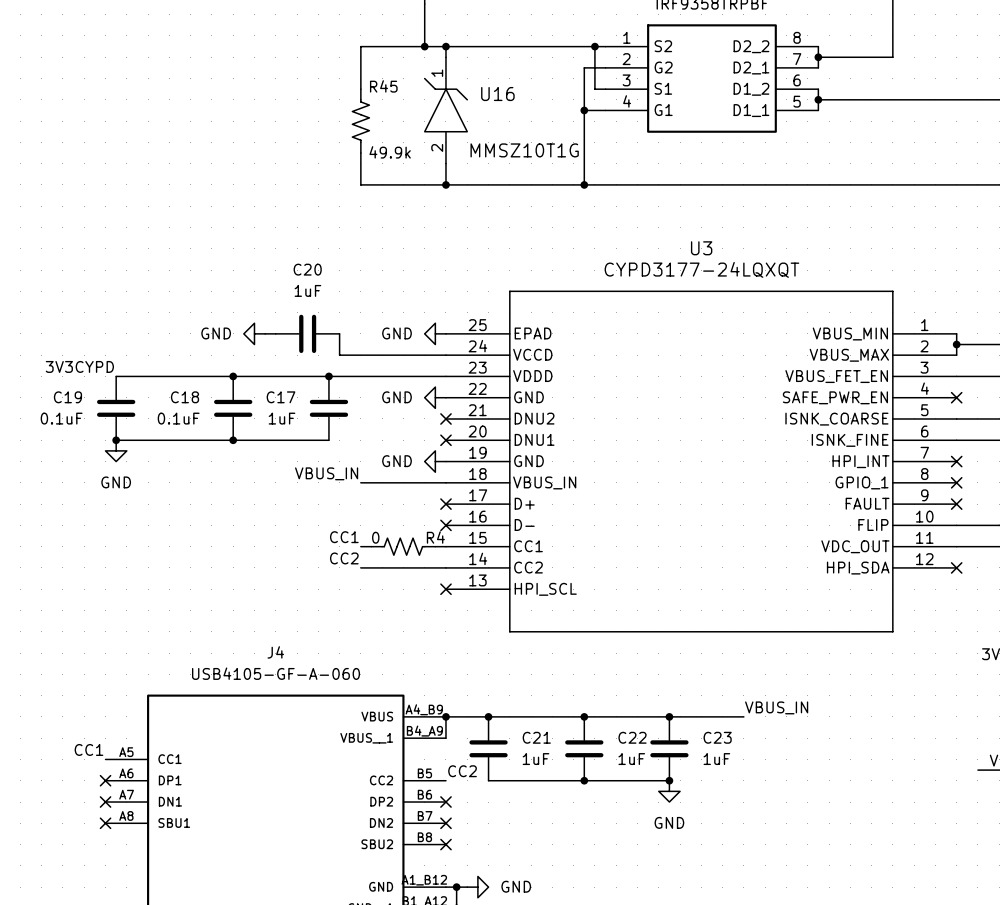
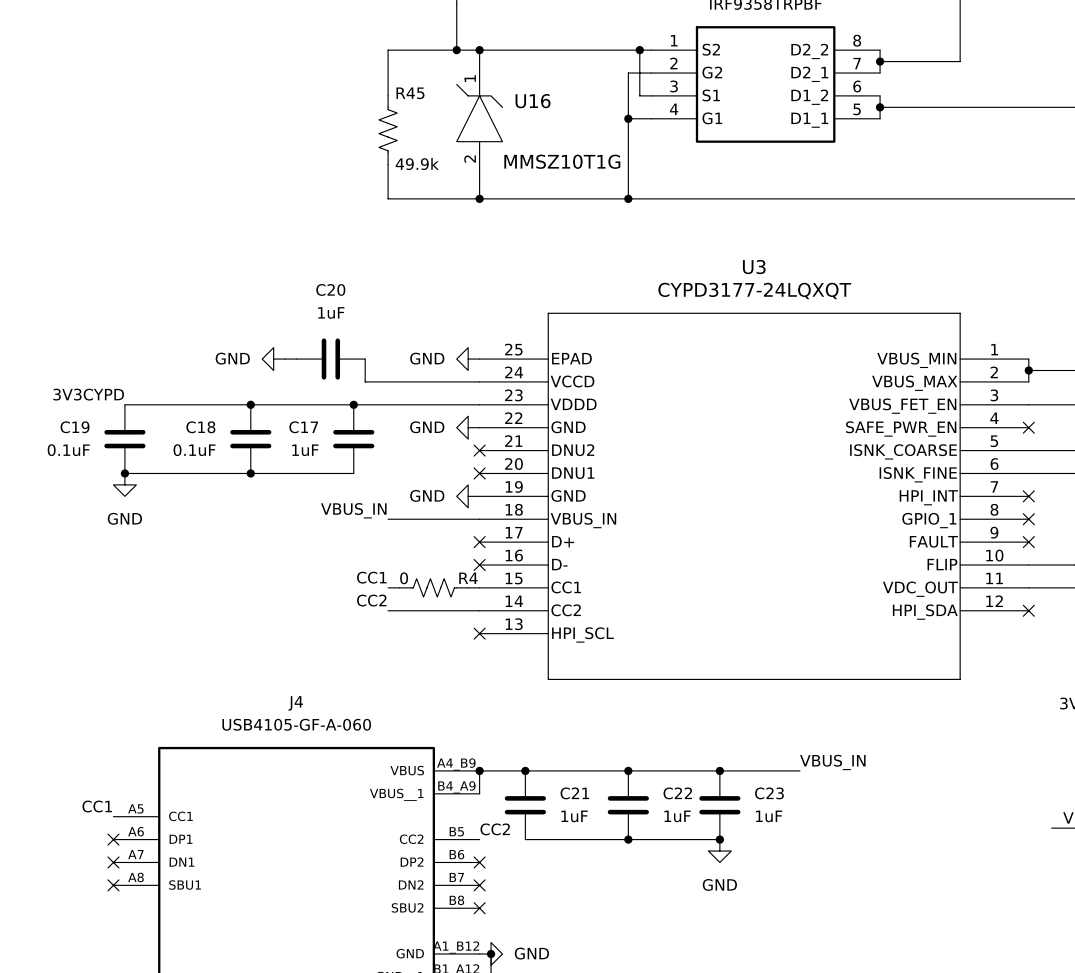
power symbol position: GND (477, 887) -> GND (491, 954)

